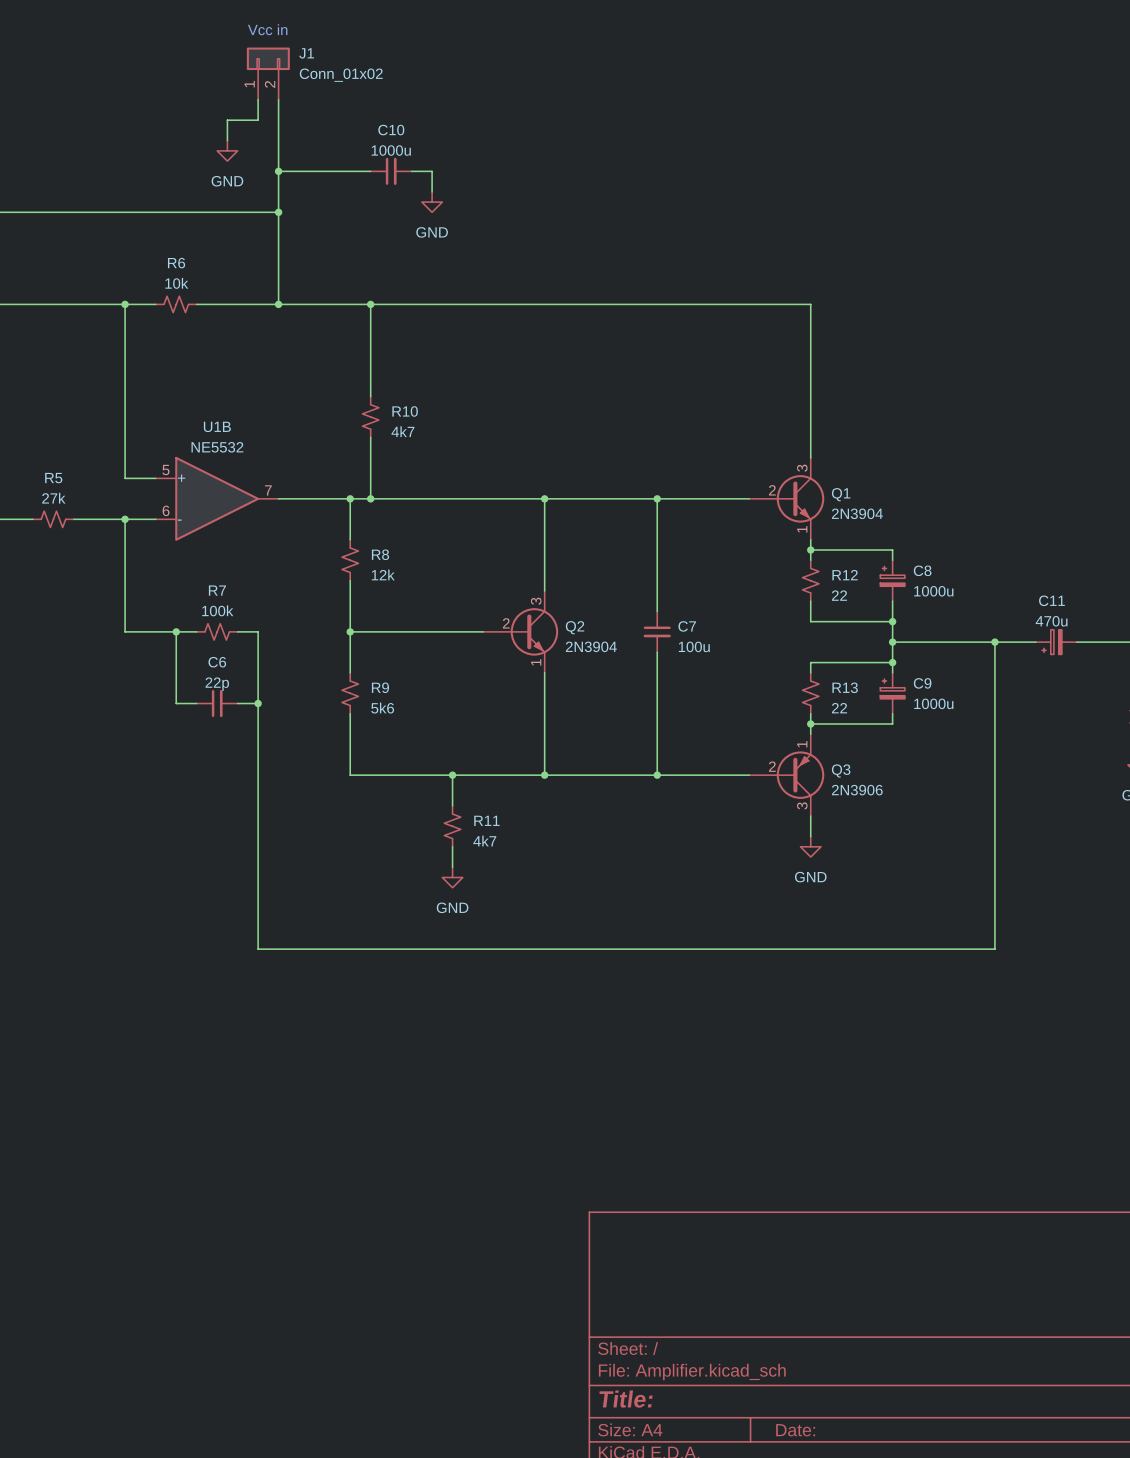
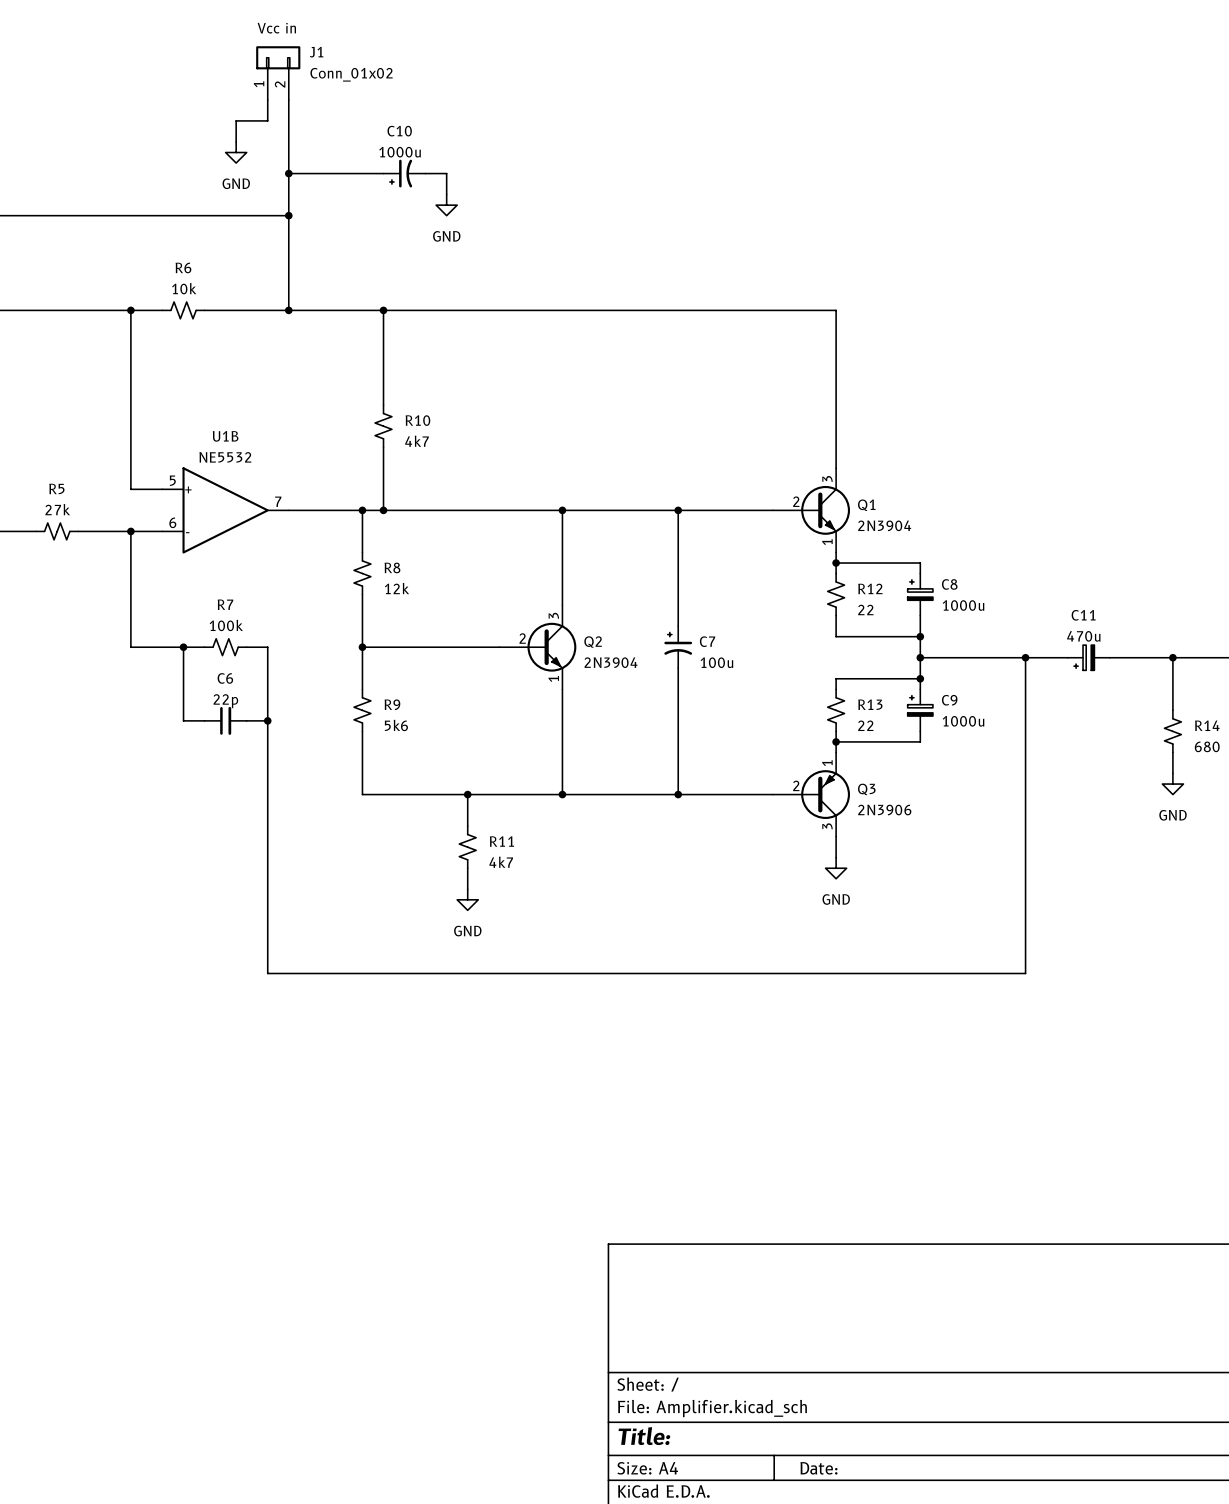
C10 symbol: [370, 157, 412, 185] -> [383, 159, 426, 188]
C7 symbol: [643, 611, 671, 653] -> [664, 626, 693, 669]

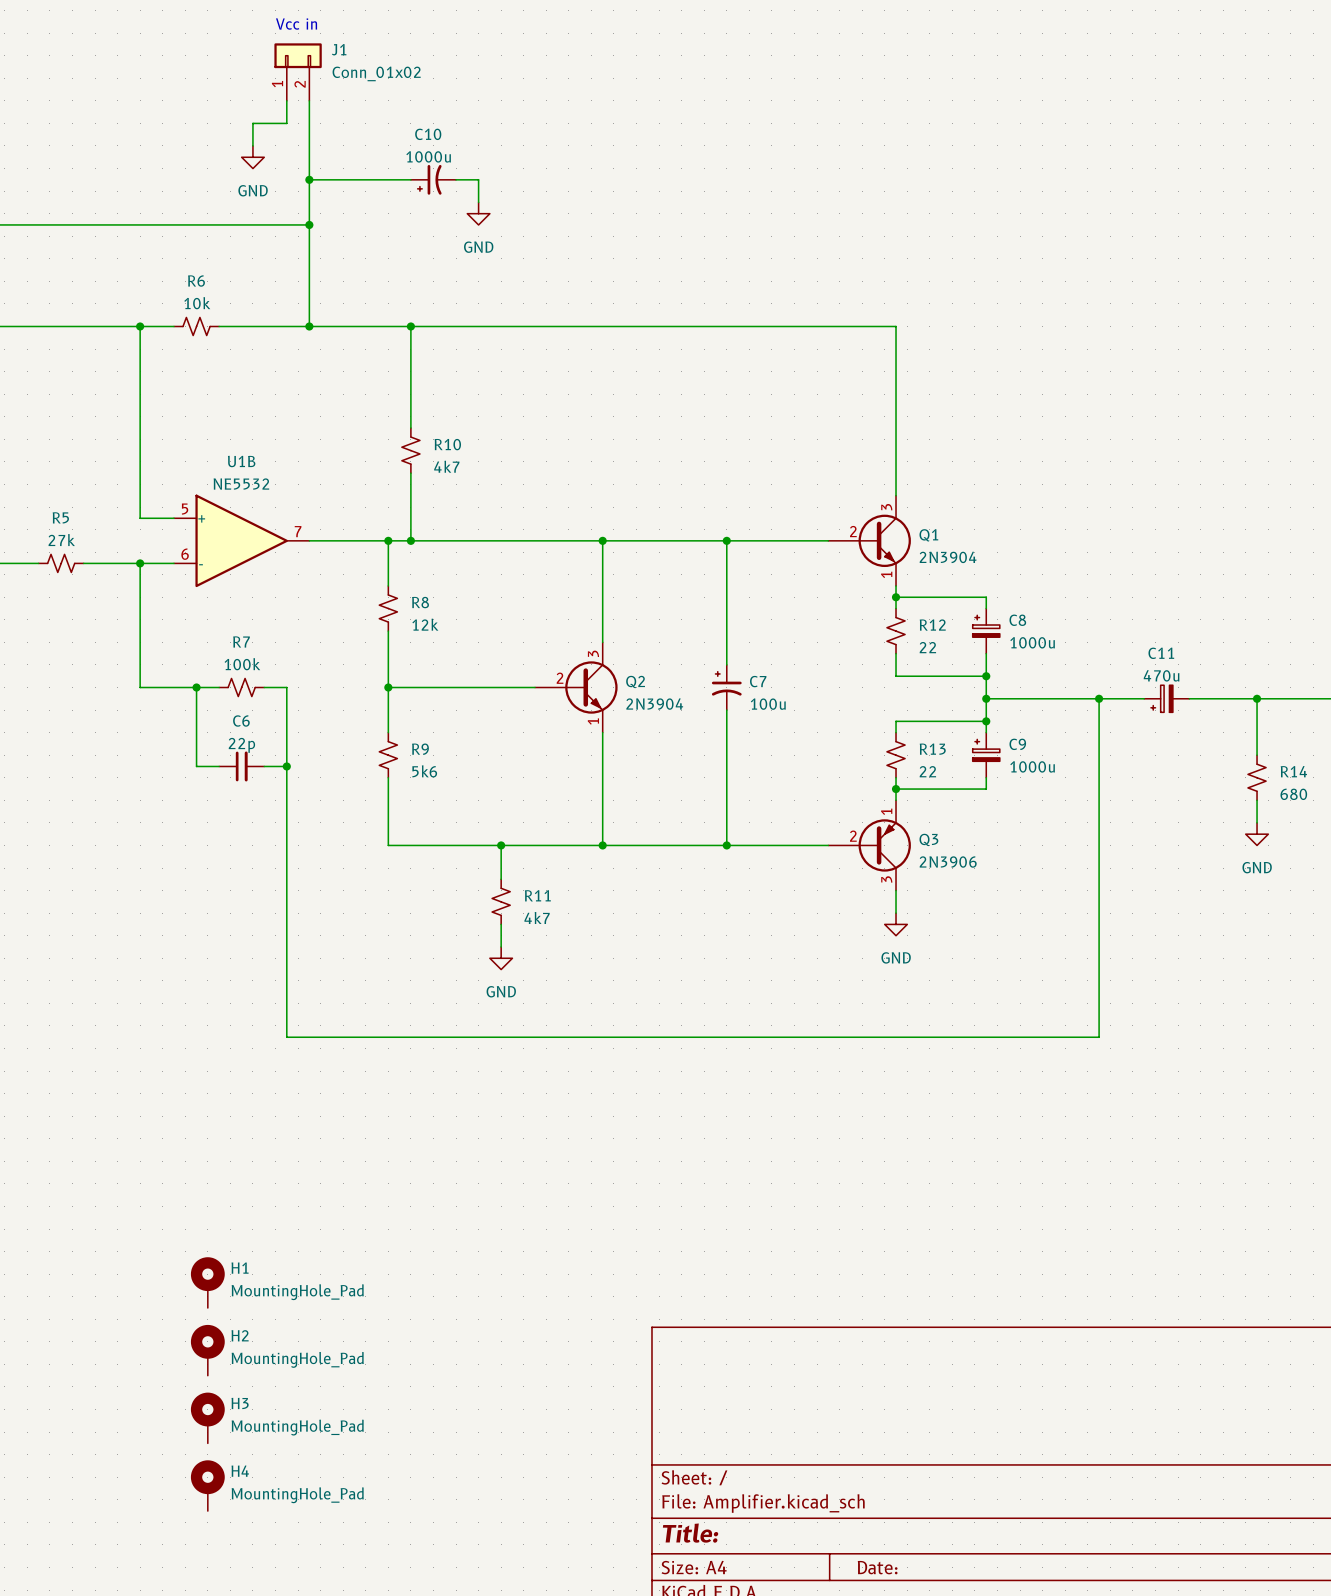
H1: none -> MountingHole_Pad (207, 1282)
H2: none -> MountingHole_Pad (207, 1350)
H3: none -> MountingHole_Pad (207, 1417)
H4: none -> MountingHole_Pad (207, 1485)

